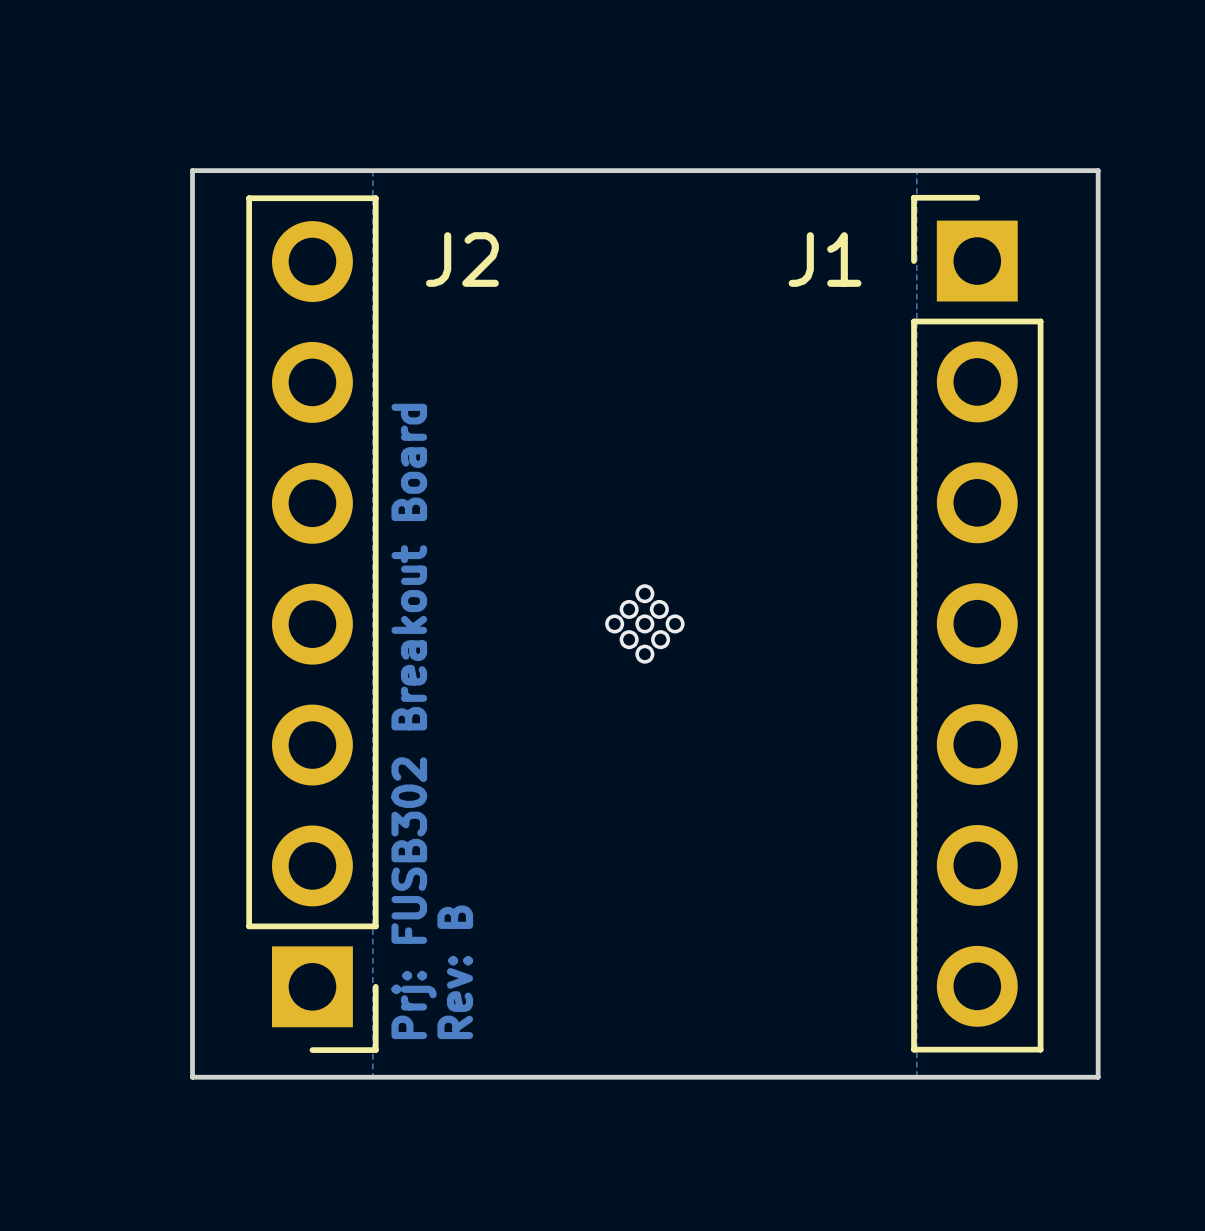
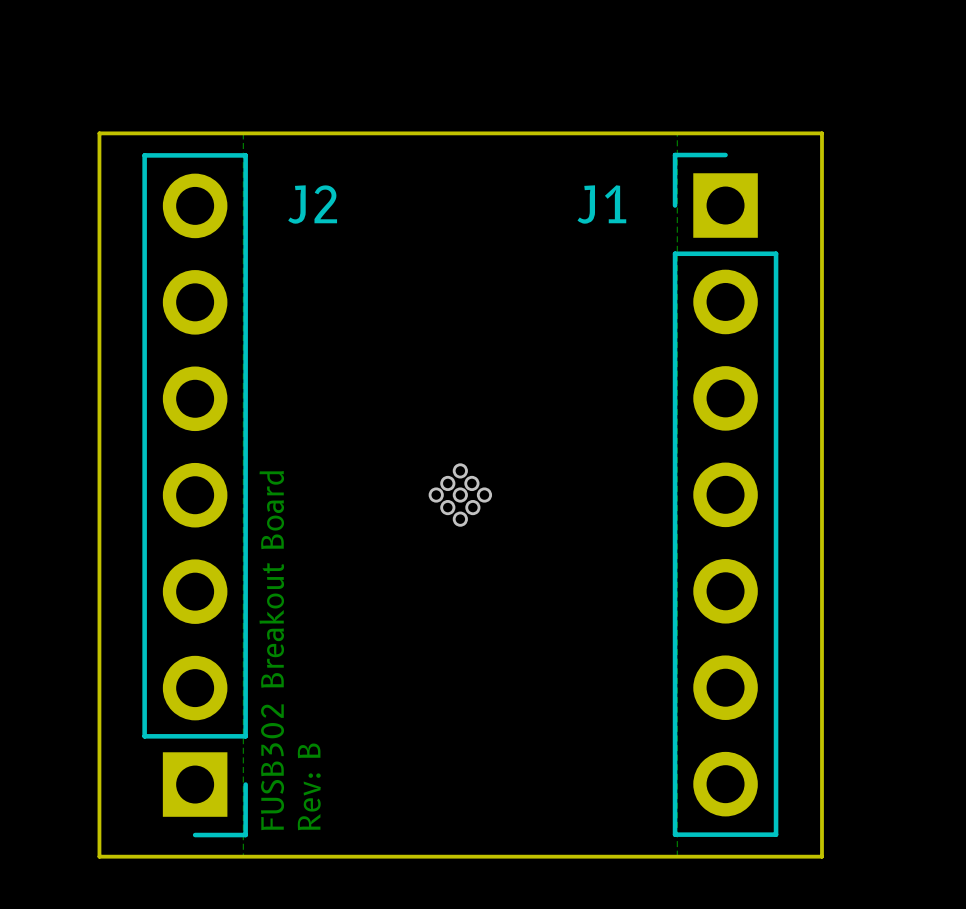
text: Prj: FUSB302 Breakout Board (414, 721) -> FUSB302 Breakout Board (271, 650)

